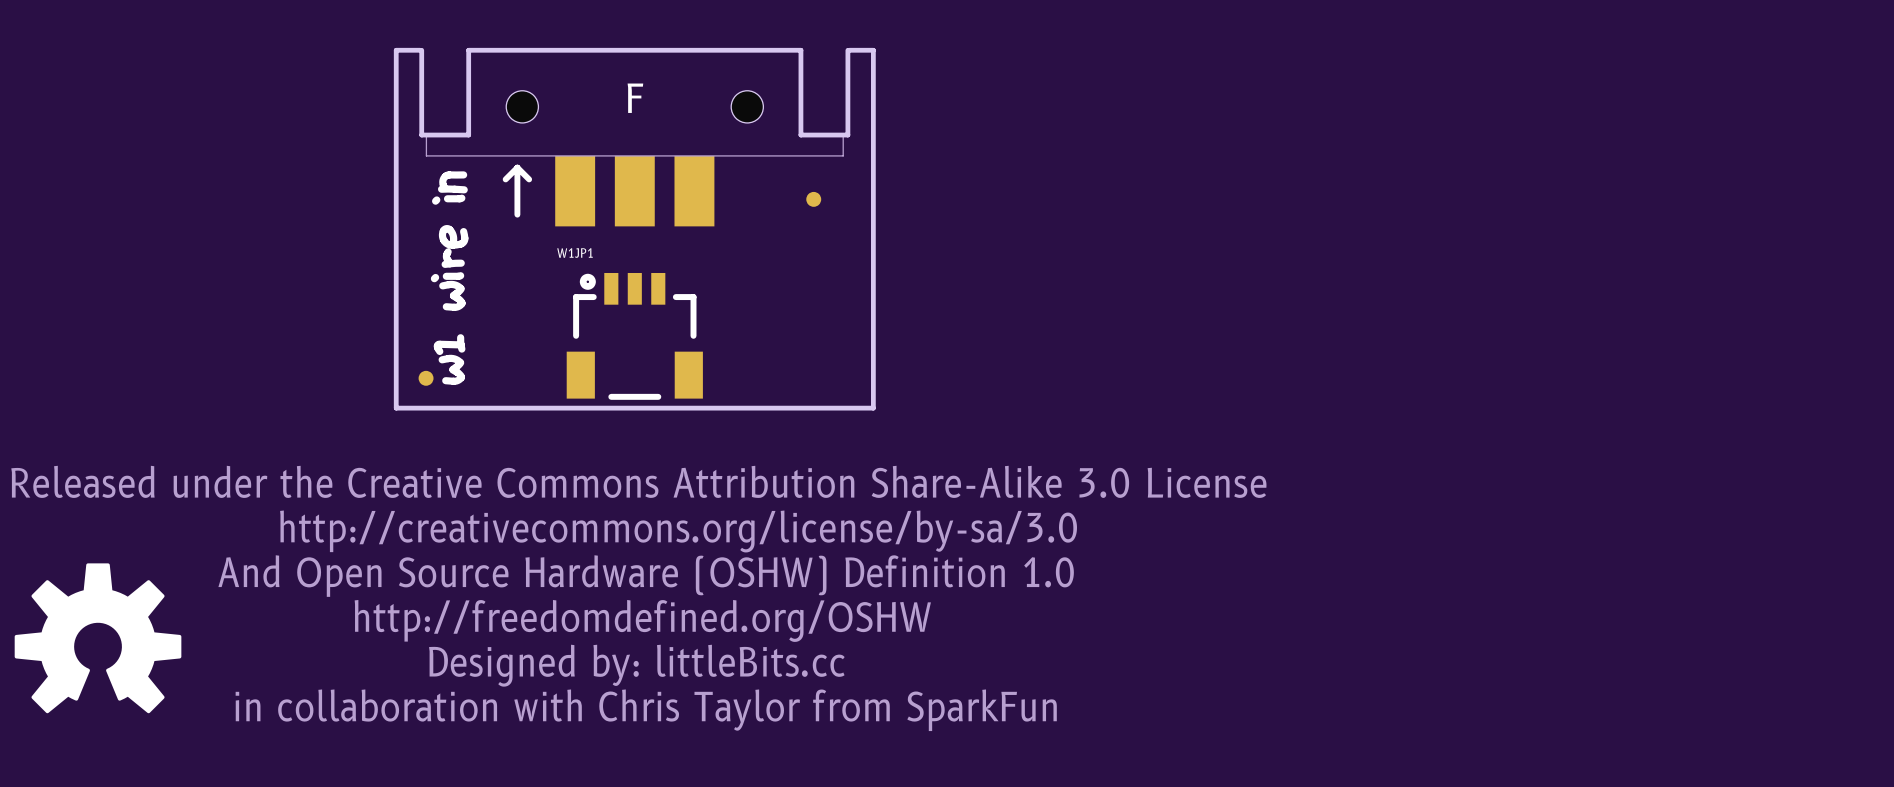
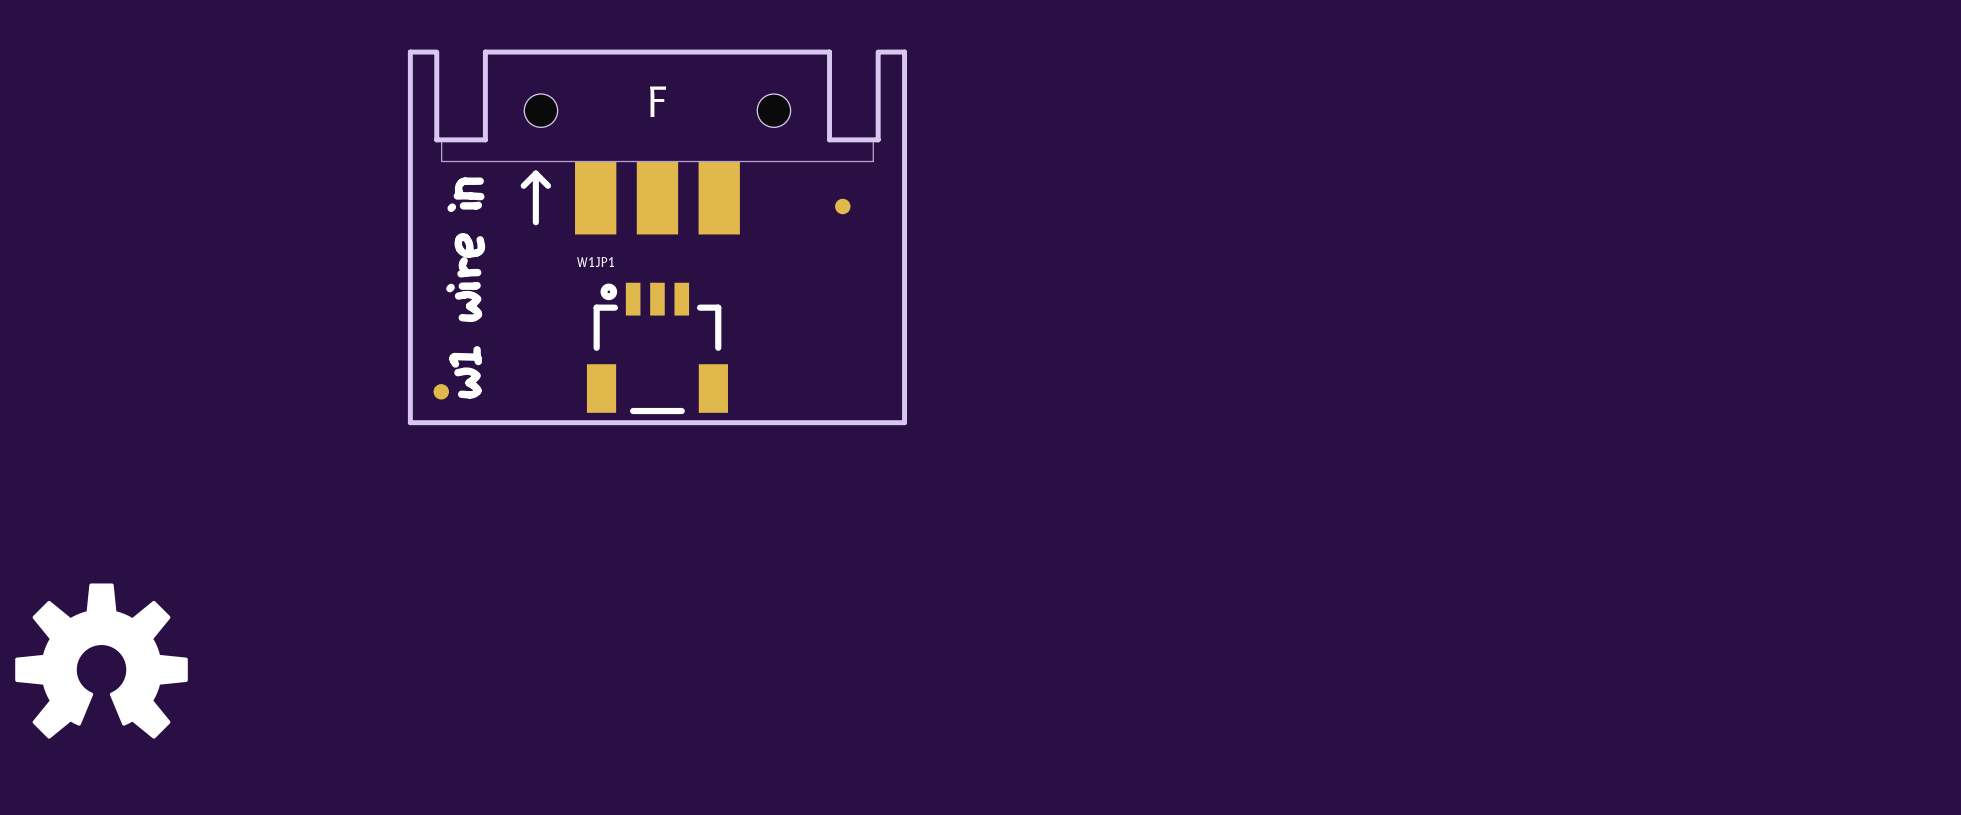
drawing: [11, 465, 1267, 732] -> none

